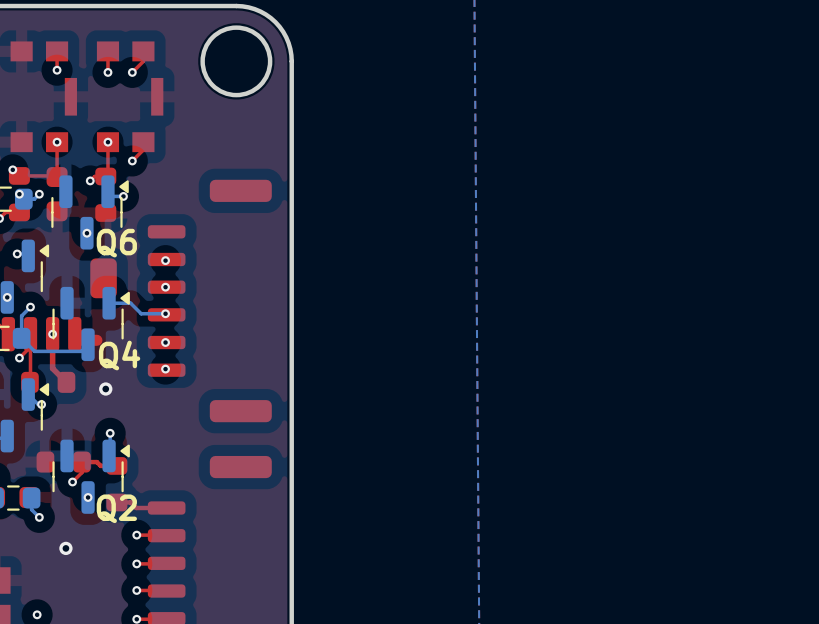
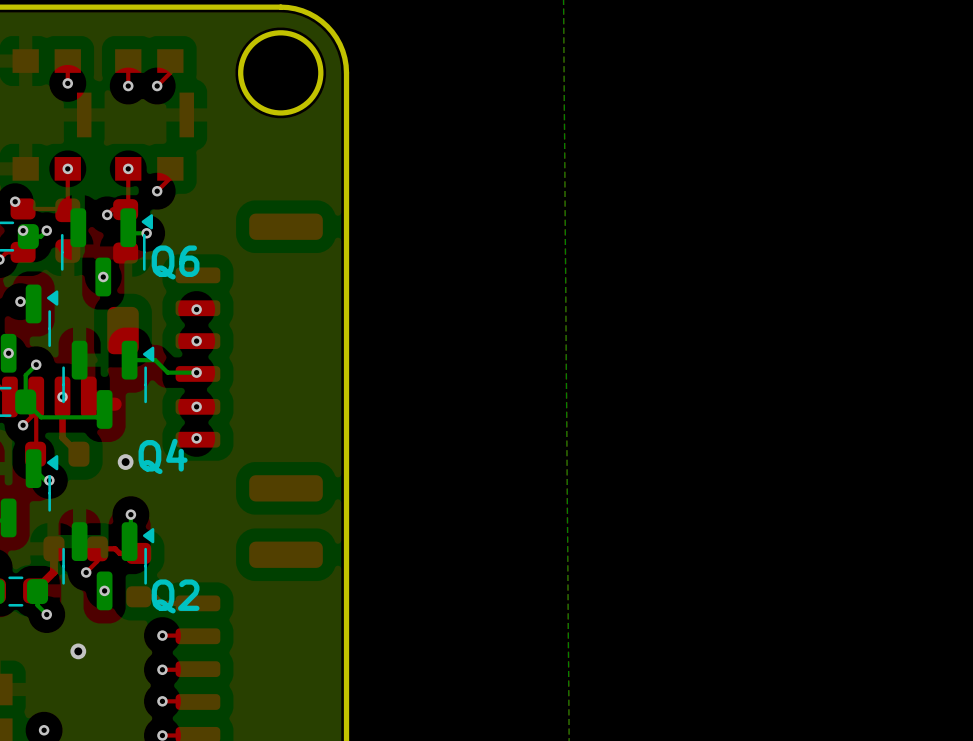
Q6 name position: Q6 (116, 243) -> Q6 (175, 262)
Q4 name position: Q4 (119, 355) -> Q4 (163, 456)
top track: none -> (53, 548) (53, 571) (34, 590)
Q2 name position: Q2 (116, 508) -> Q2 (175, 596)

